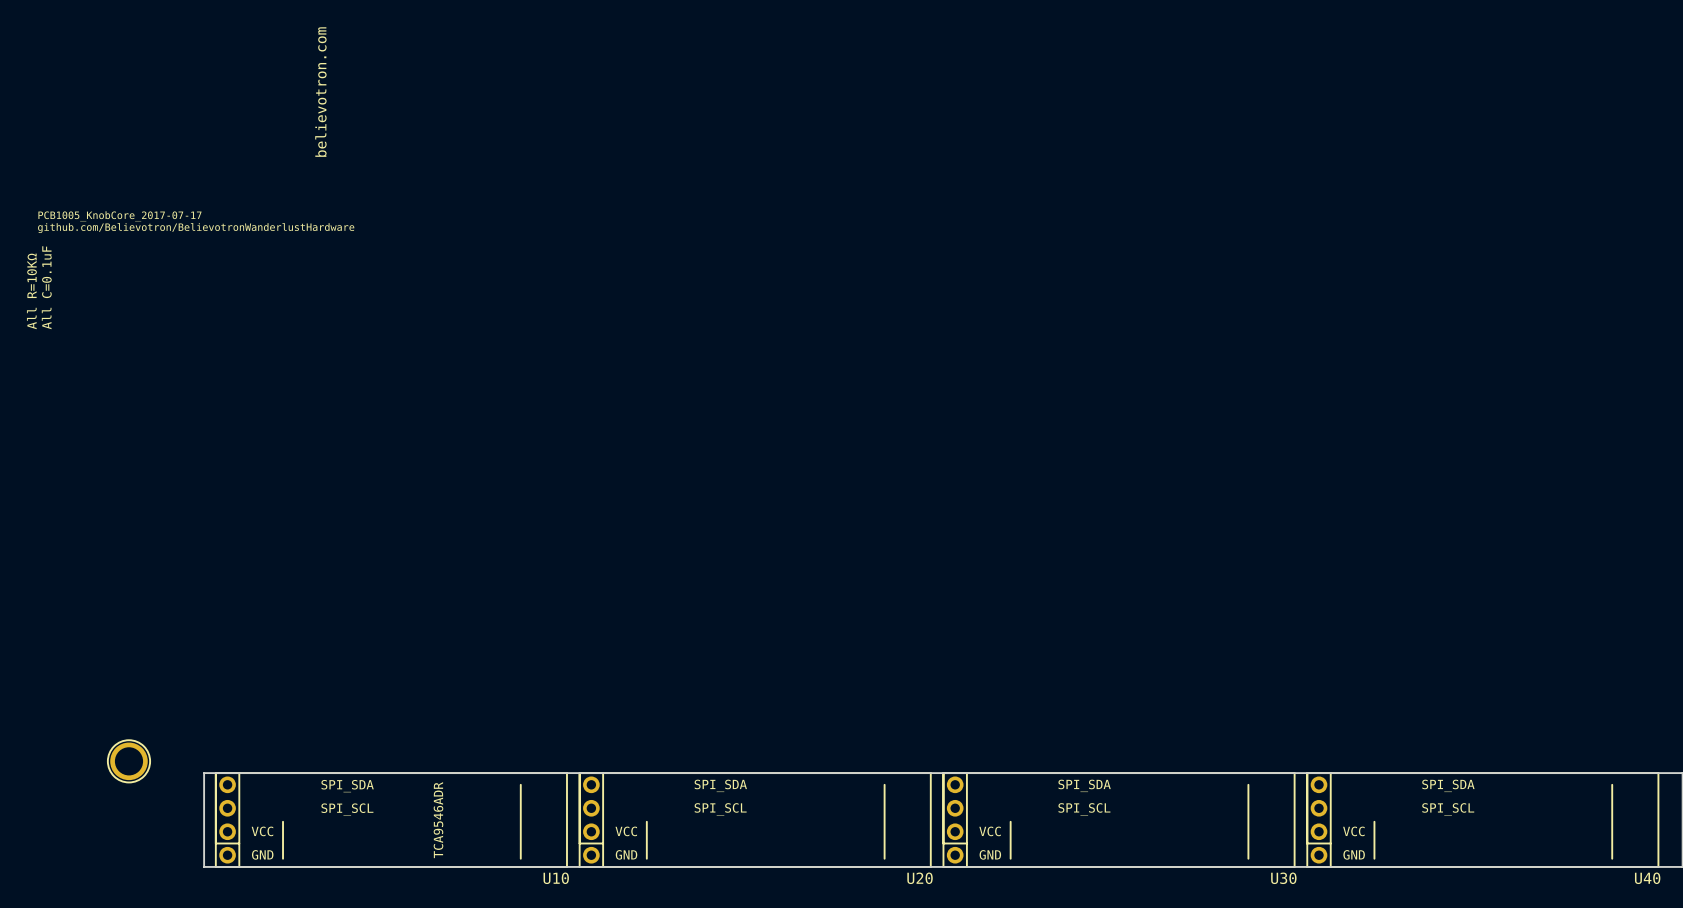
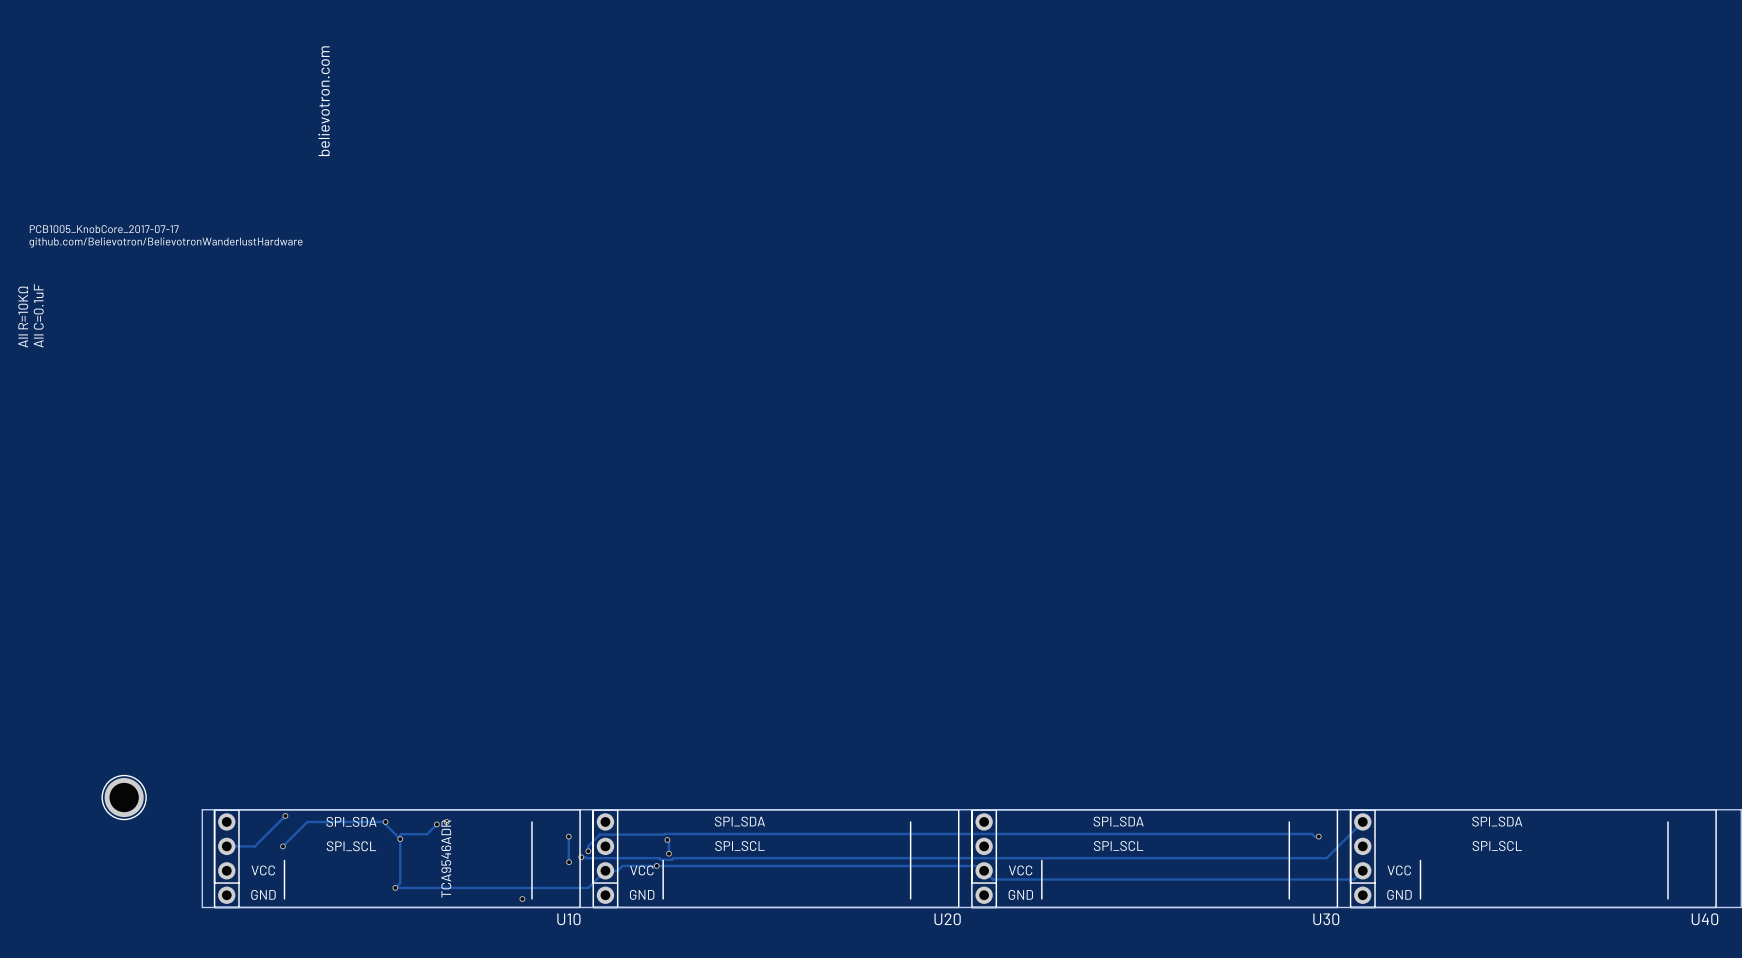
track: none -> (285, 815) (254, 846) (226, 846)
via: none -> (285, 815)
via: none -> (385, 821)
via: none -> (446, 821)
track: none -> (1362, 821) (1326, 858) (673, 858) (661, 859) (659, 858) (581, 857)
track: none -> (436, 824) (427, 834) (400, 834) (400, 883) (395, 887) (588, 887) (605, 870) (617, 870) (622, 865) (979, 865) (992, 879) (1354, 879) (1362, 870)
via: none -> (436, 824)
track: none -> (568, 836) (569, 862)
via: none -> (568, 836)
track: none -> (1318, 836) (1314, 836) (1312, 833) (599, 834) (588, 846) (588, 851)
via: none -> (1318, 836)
track: none -> (400, 839) (385, 824) (385, 821) (307, 821) (282, 846)
via: none -> (400, 839)
track: none -> (667, 839) (668, 853)
via: none -> (667, 839)
via: none -> (282, 846)
via: none -> (588, 851)
via: none -> (668, 853)
via: none -> (581, 857)
via: none -> (569, 862)
via: none -> (656, 865)
via: none -> (395, 887)
via: none -> (522, 899)

